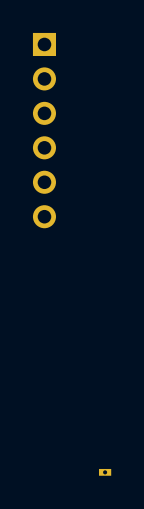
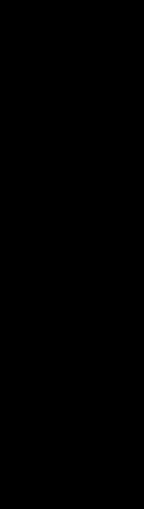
part: (44, 130) -> none
part: (105, 472) -> none

